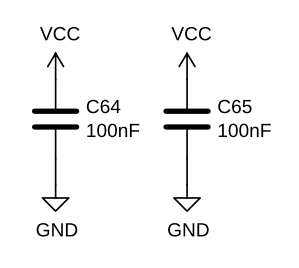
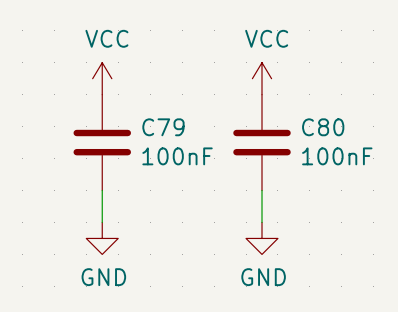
C64 name: C64 (103, 106) -> C79 (163, 127)
C65 name: C65 (234, 106) -> C80 (323, 127)

